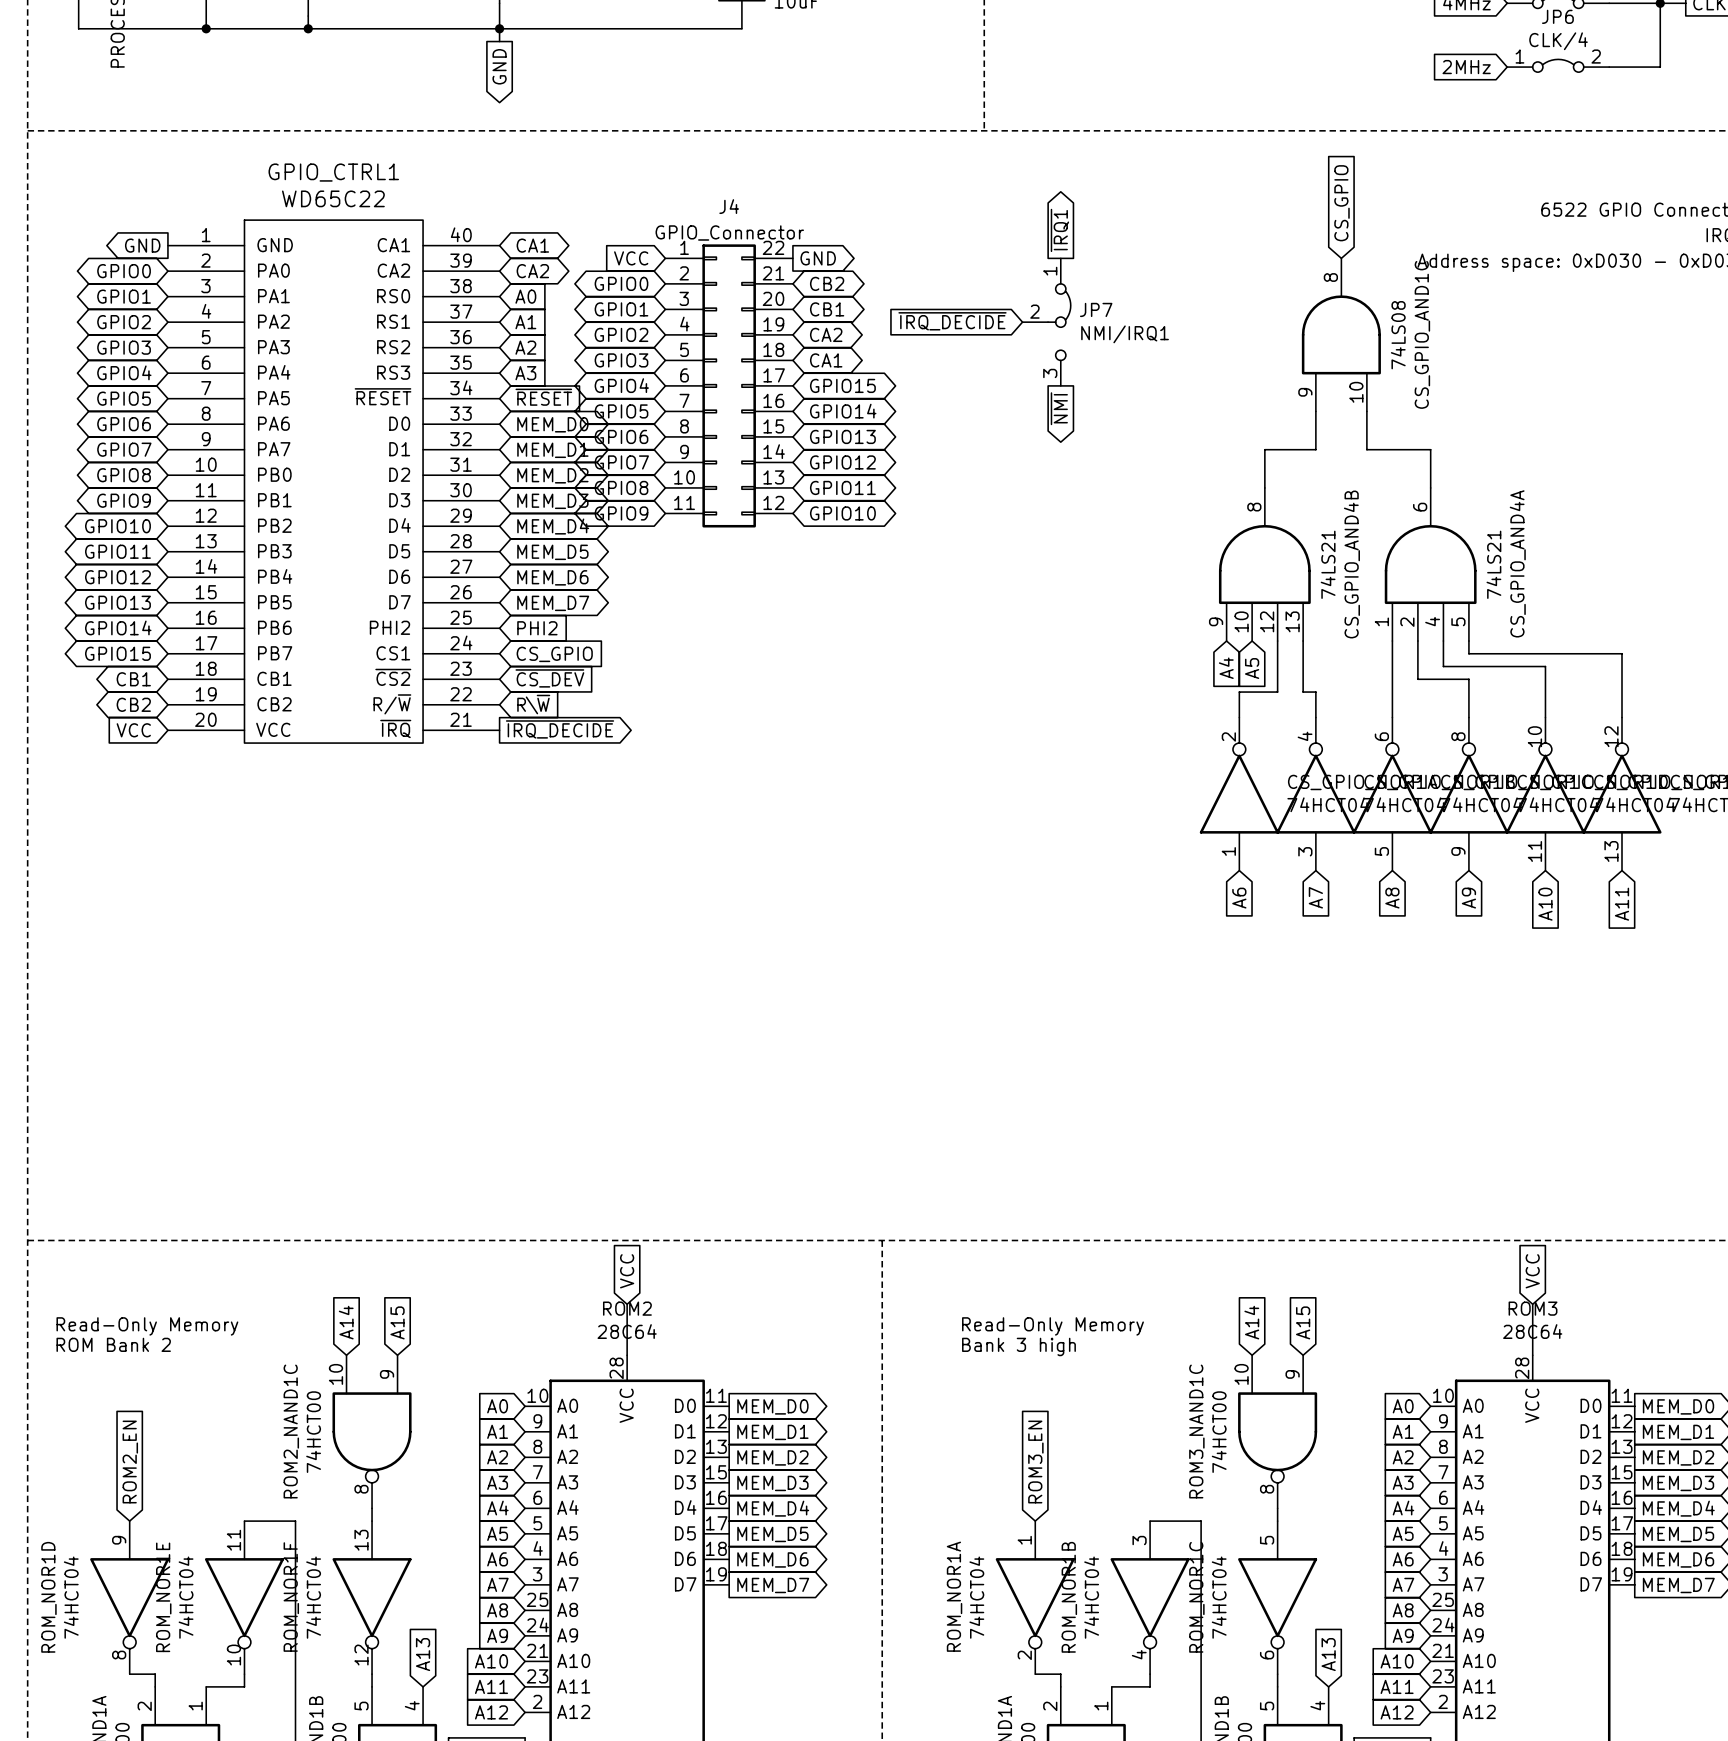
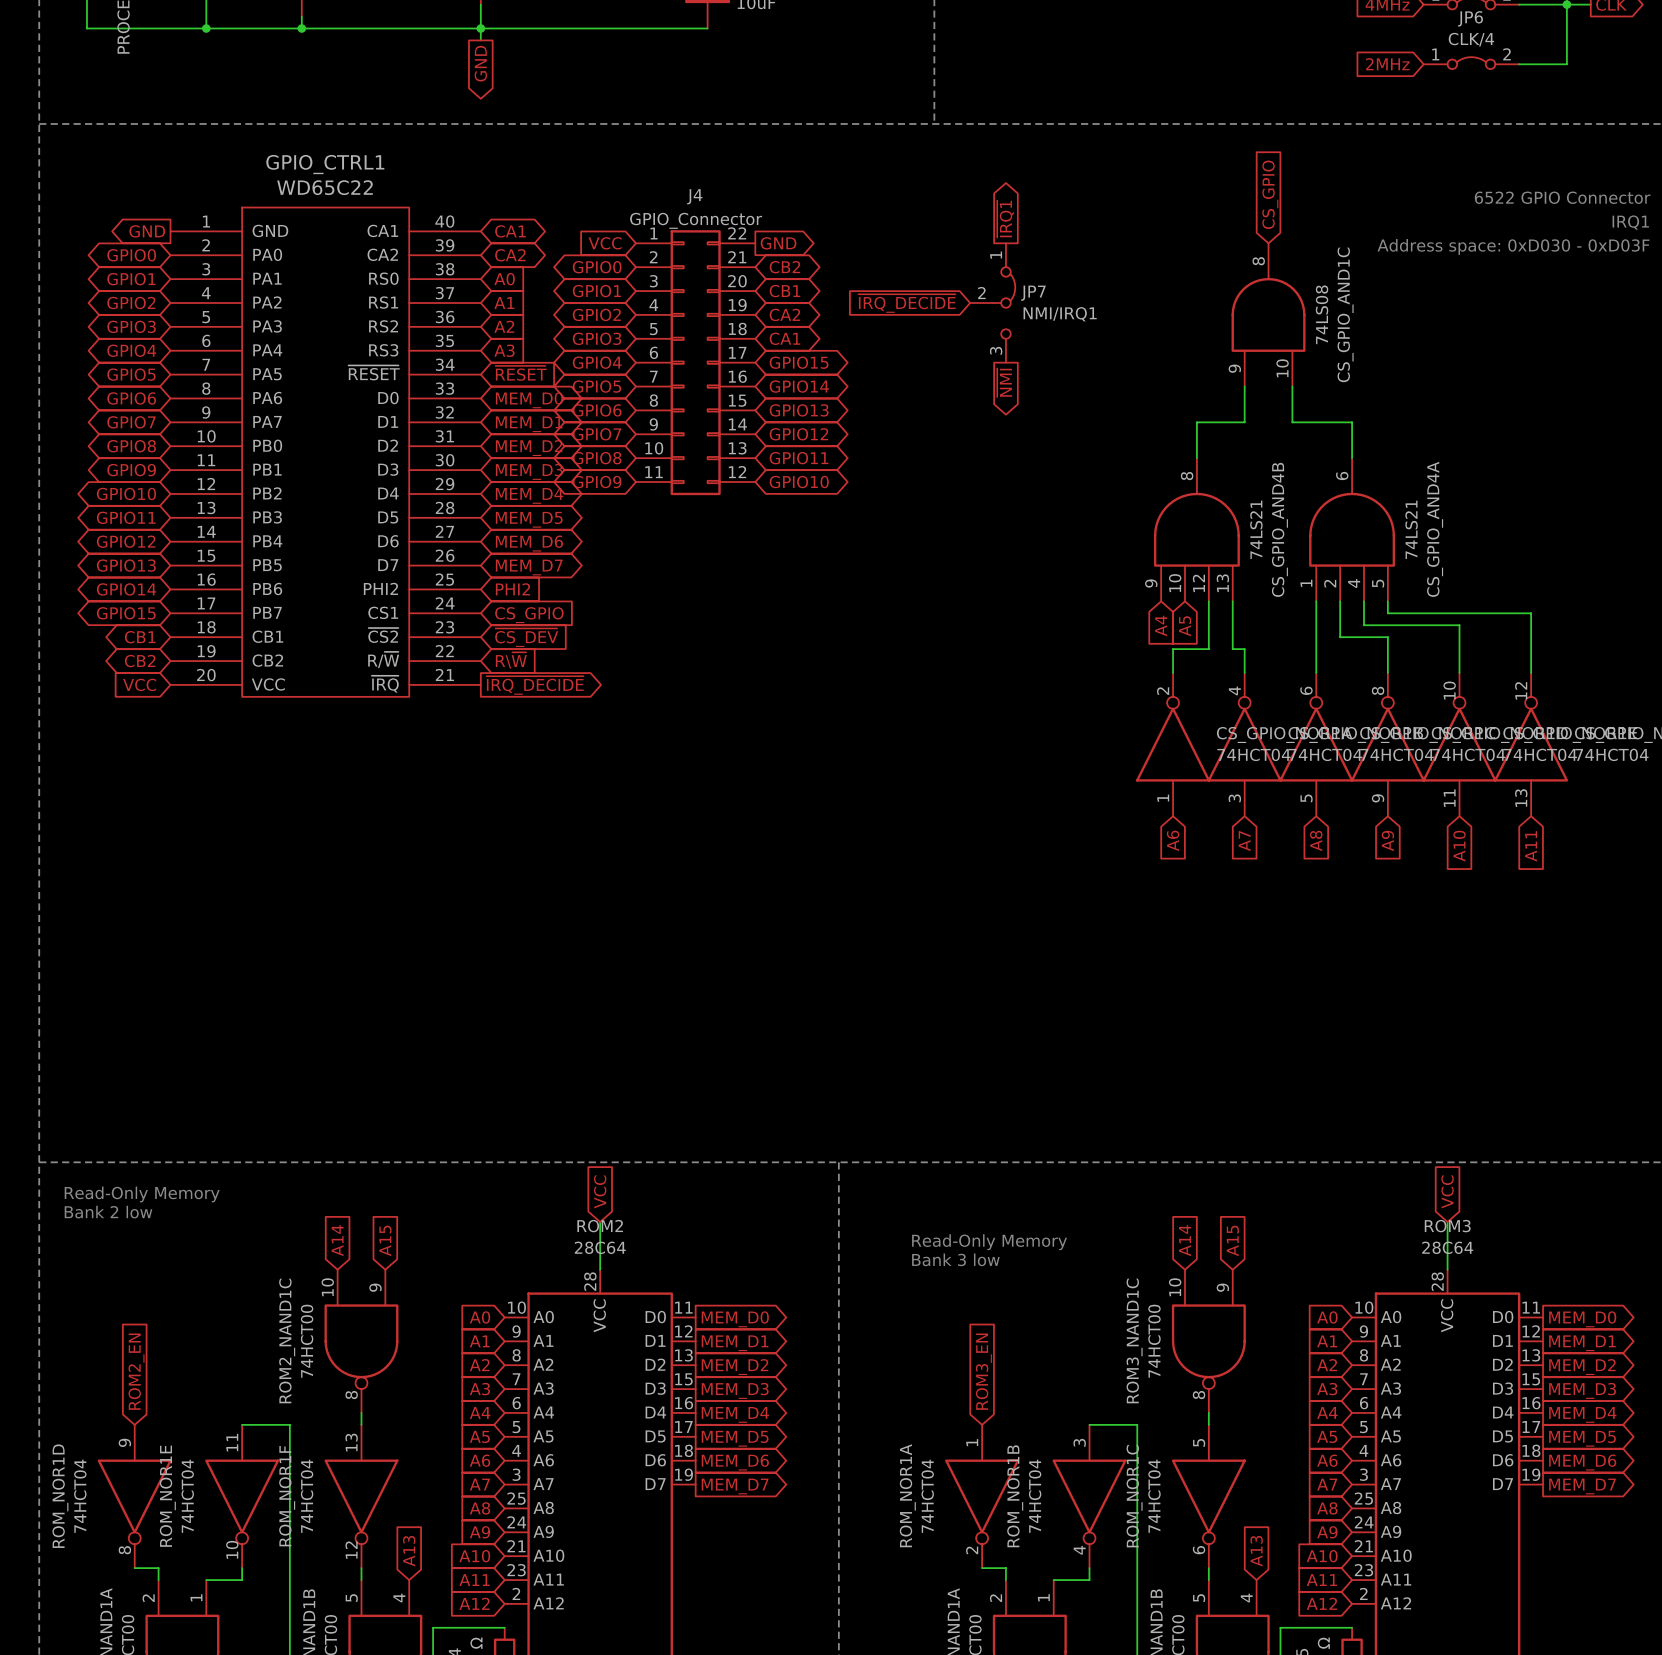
text: none -> Bank 2 low (108, 1212)
text position: Read-Only Memory (147, 1326) -> Read-Only Memory (142, 1194)
text: ROM Bank 2 (113, 1344) -> none
text: Bank 3 high (1018, 1346) -> Bank 3 low (955, 1259)

